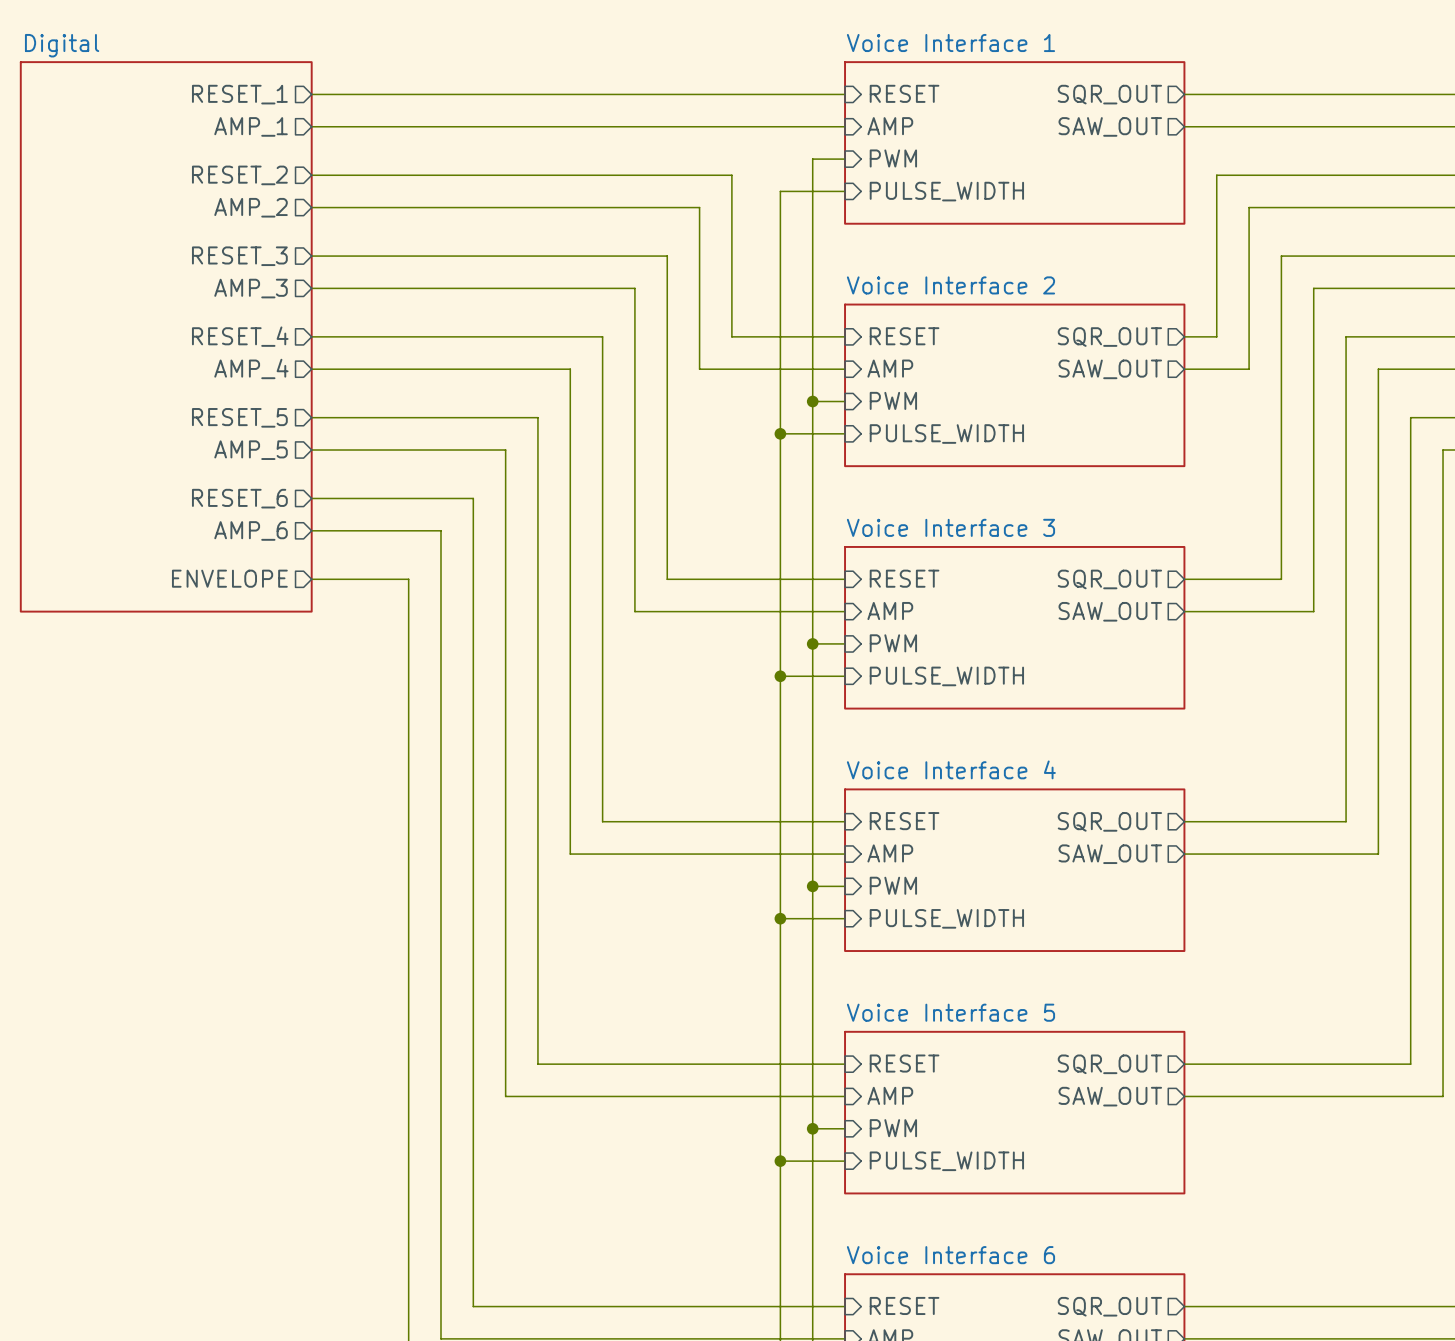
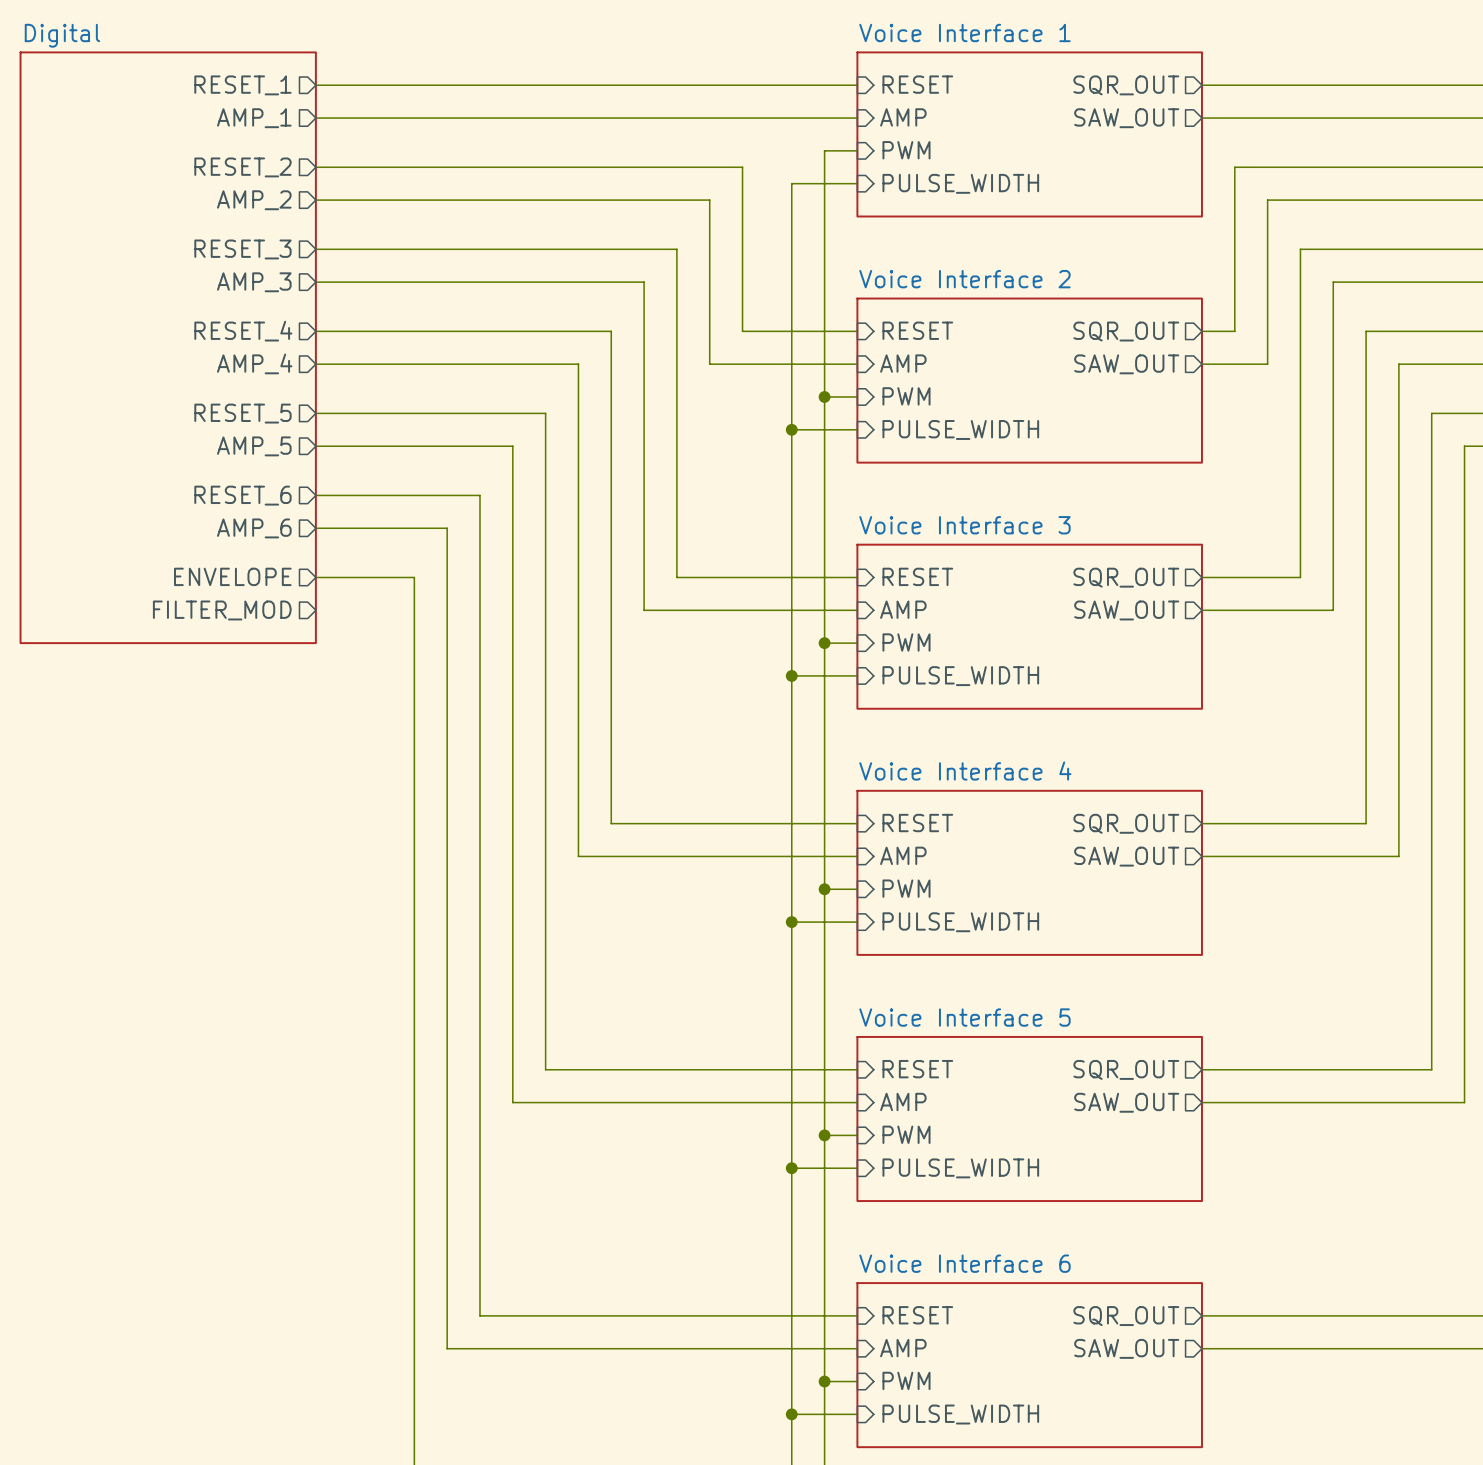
sheet Digital: (166, 336) -> none
sheet Digital: none -> (168, 347)
sheet pin: none -> FILTER_MOD (222, 610)

